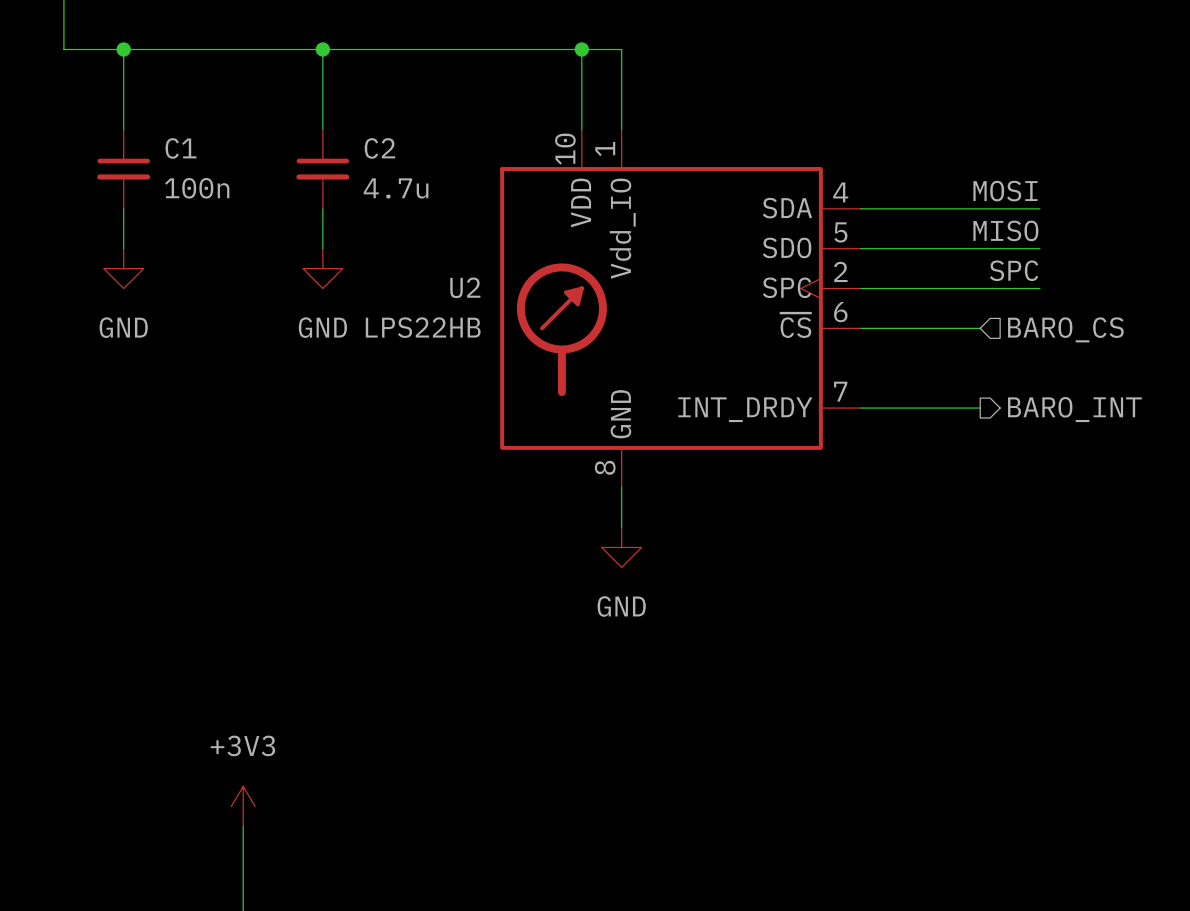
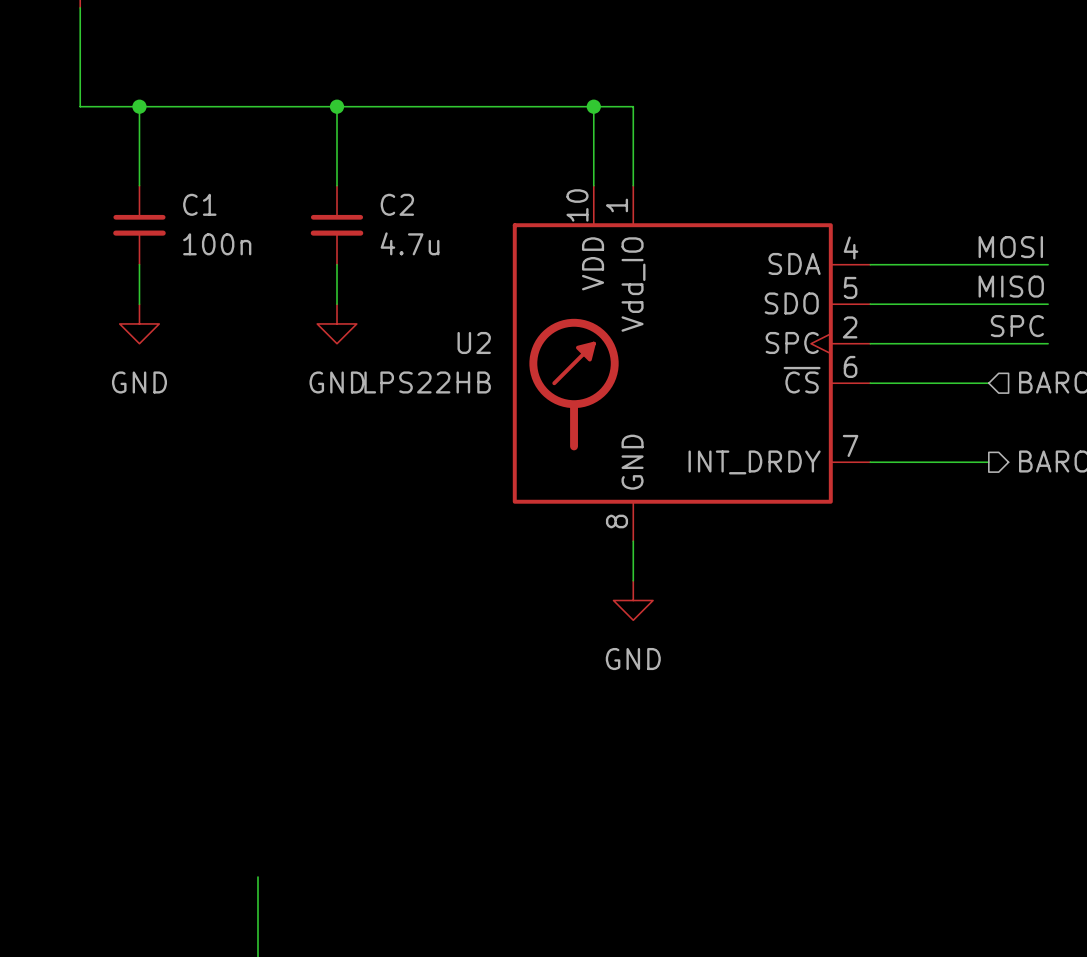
power symbol: +3V3 (243, 806) -> none

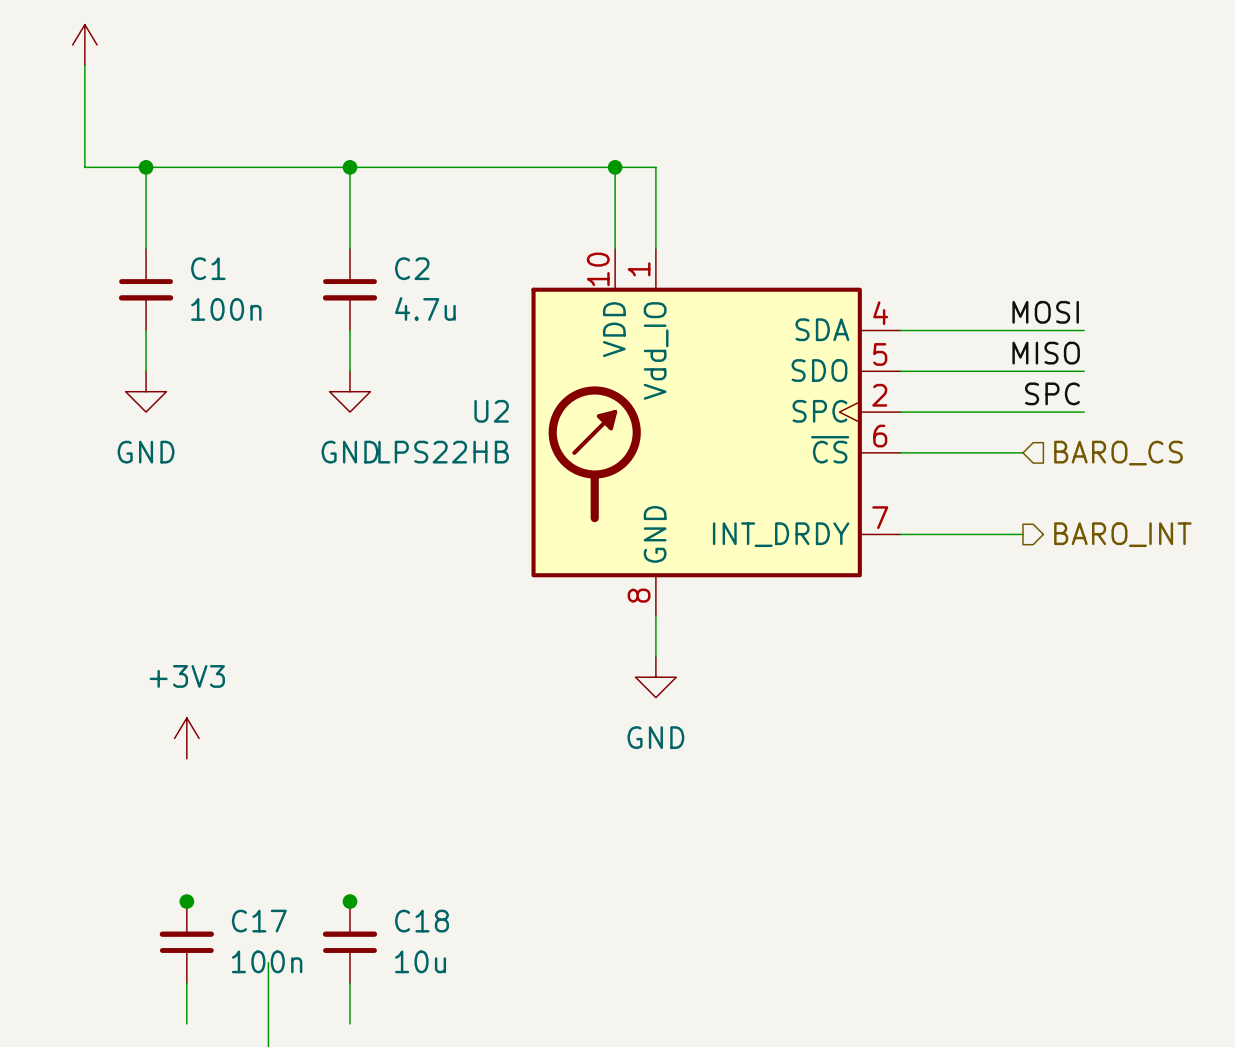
power symbol: none -> +3V3 (186, 738)
junction: none -> (186, 901)
junction: none -> (349, 901)
C17: none -> 100n (186, 942)
C18: none -> 10u (349, 942)
wire: none -> (186, 983) (186, 1023)
wire: none -> (349, 983) (349, 1023)

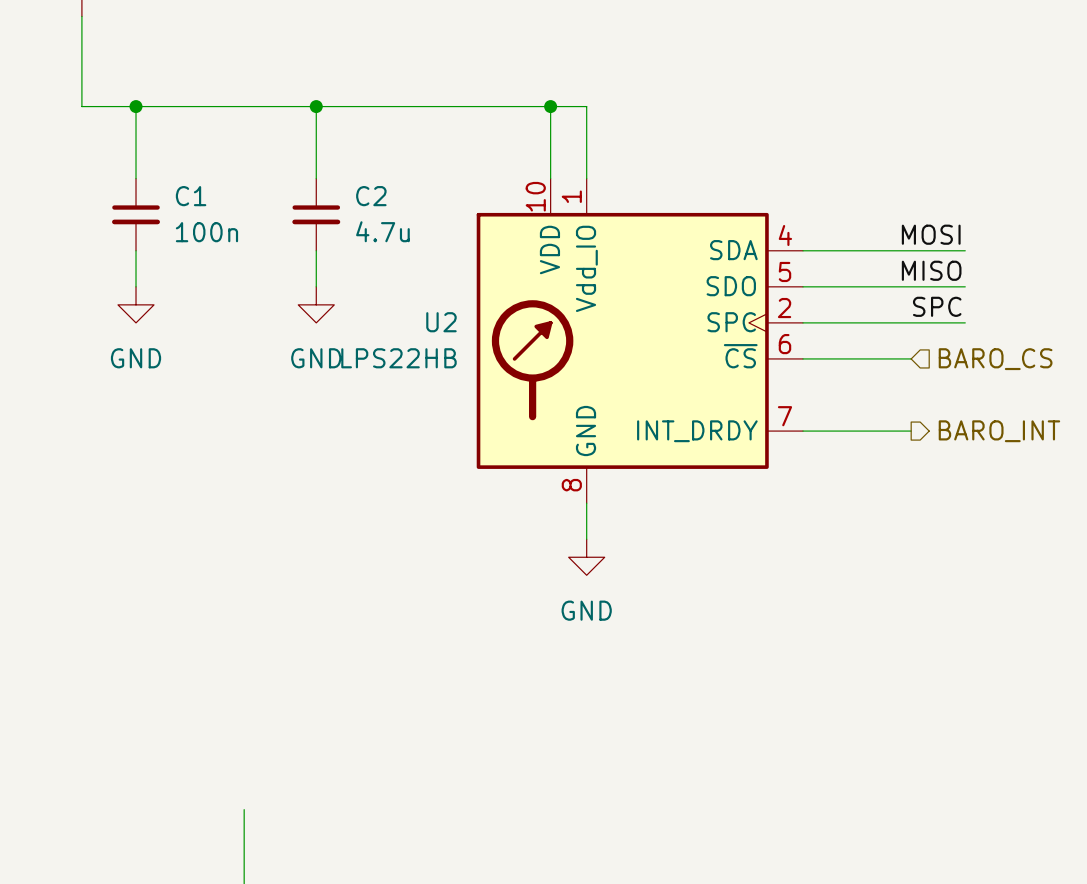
power symbol: +3V3 (186, 738) -> none
junction: (186, 901) -> none
junction: (349, 901) -> none
C17: 100n (186, 942) -> none
C18: 10u (349, 942) -> none
wire: (186, 983) (186, 1023) -> none
wire: (349, 983) (349, 1023) -> none

